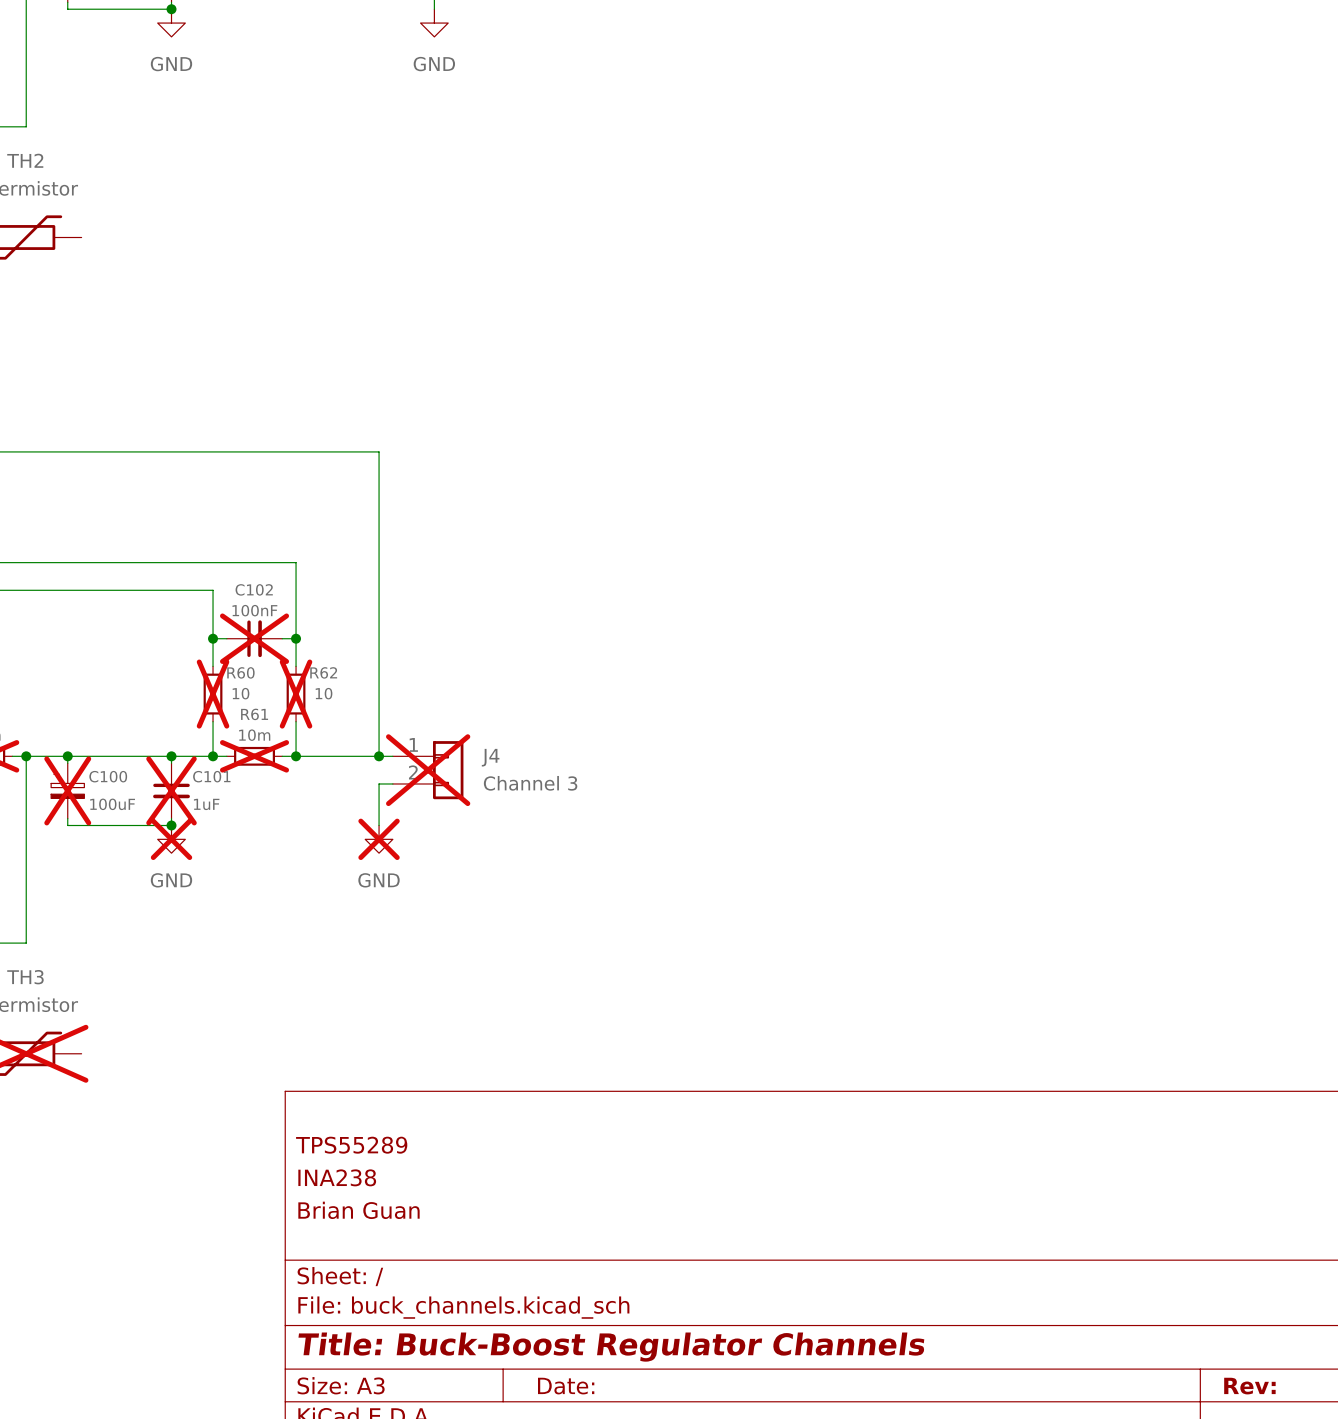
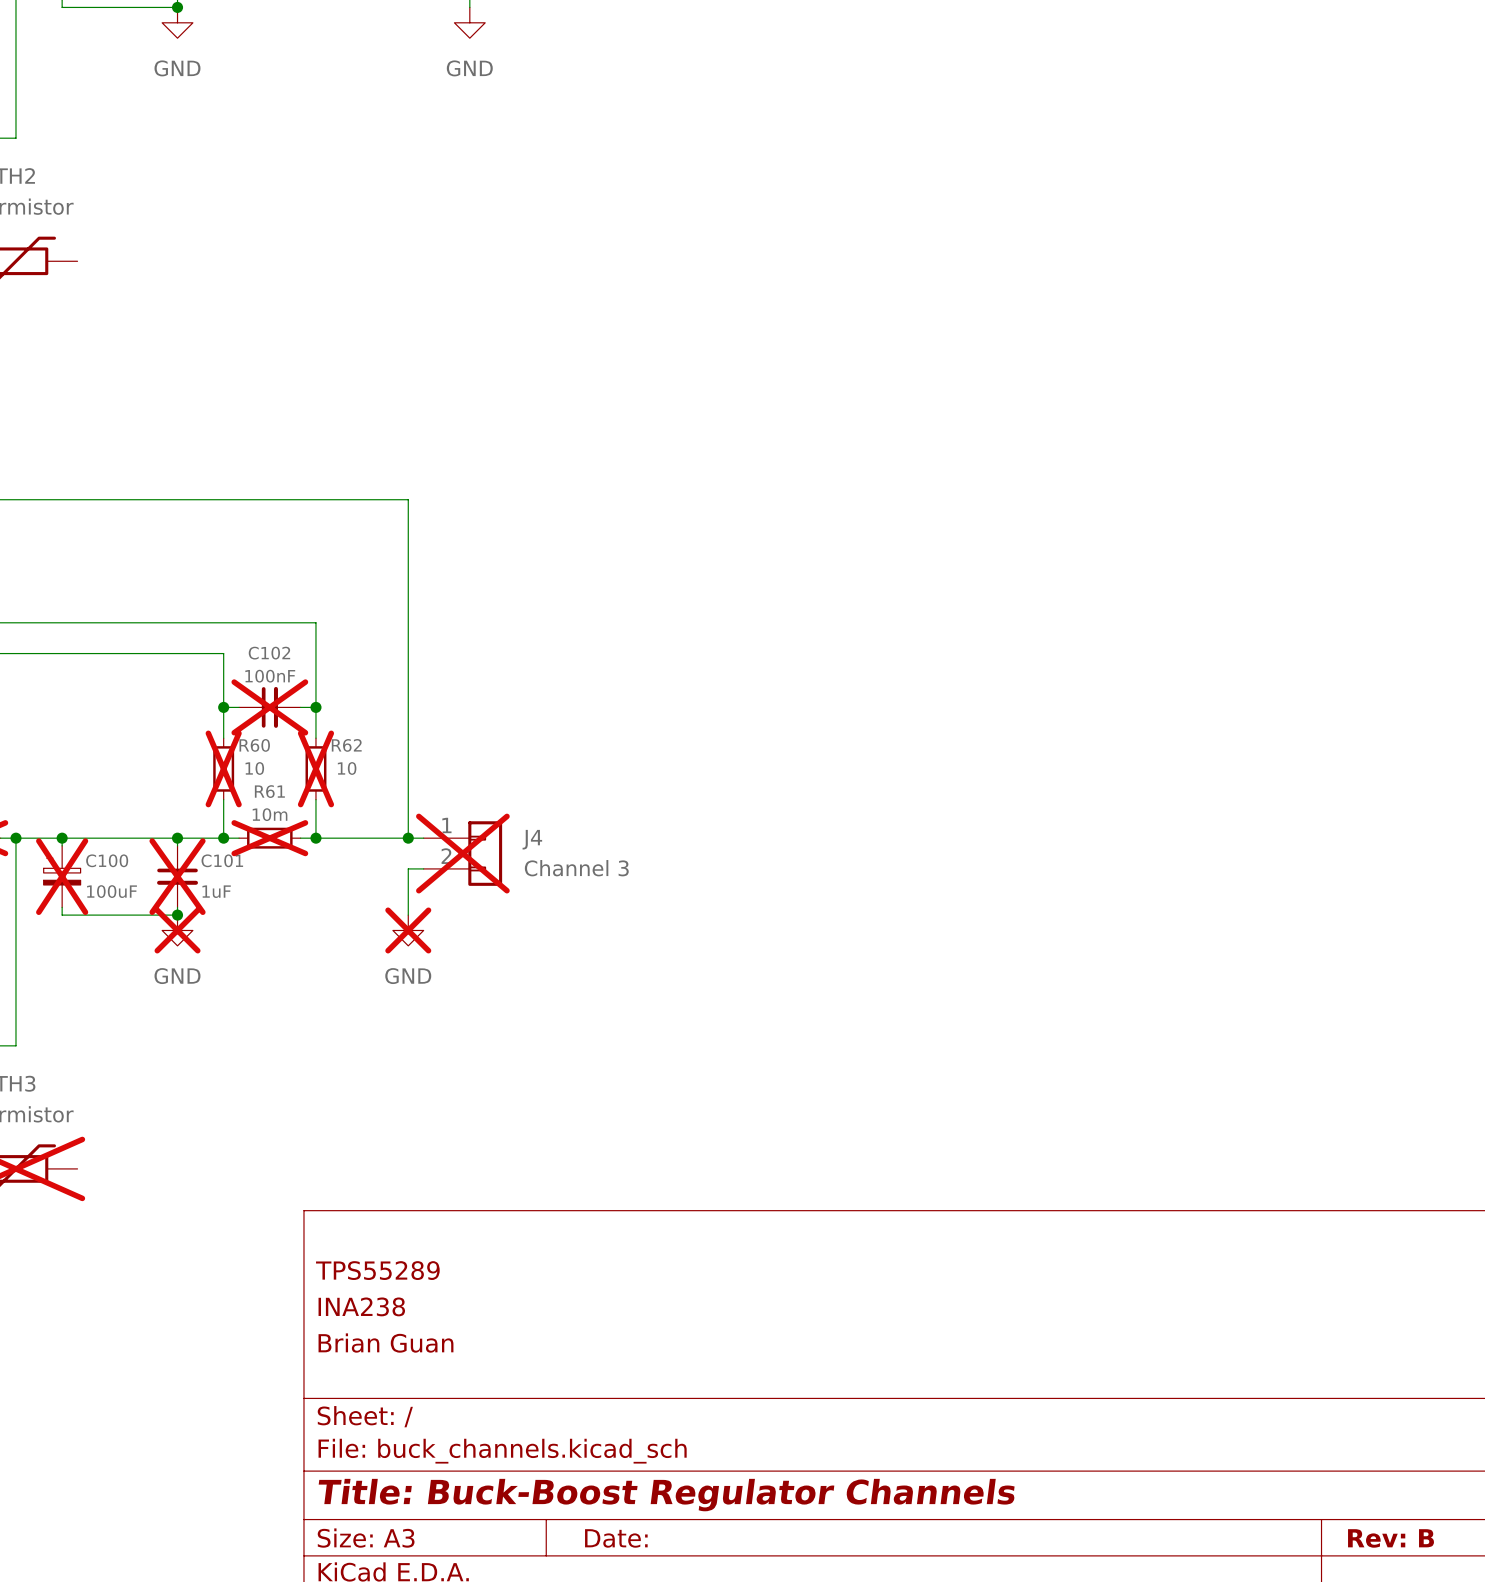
title block: Rev: (1249, 1386) -> Rev: B (1391, 1538)

